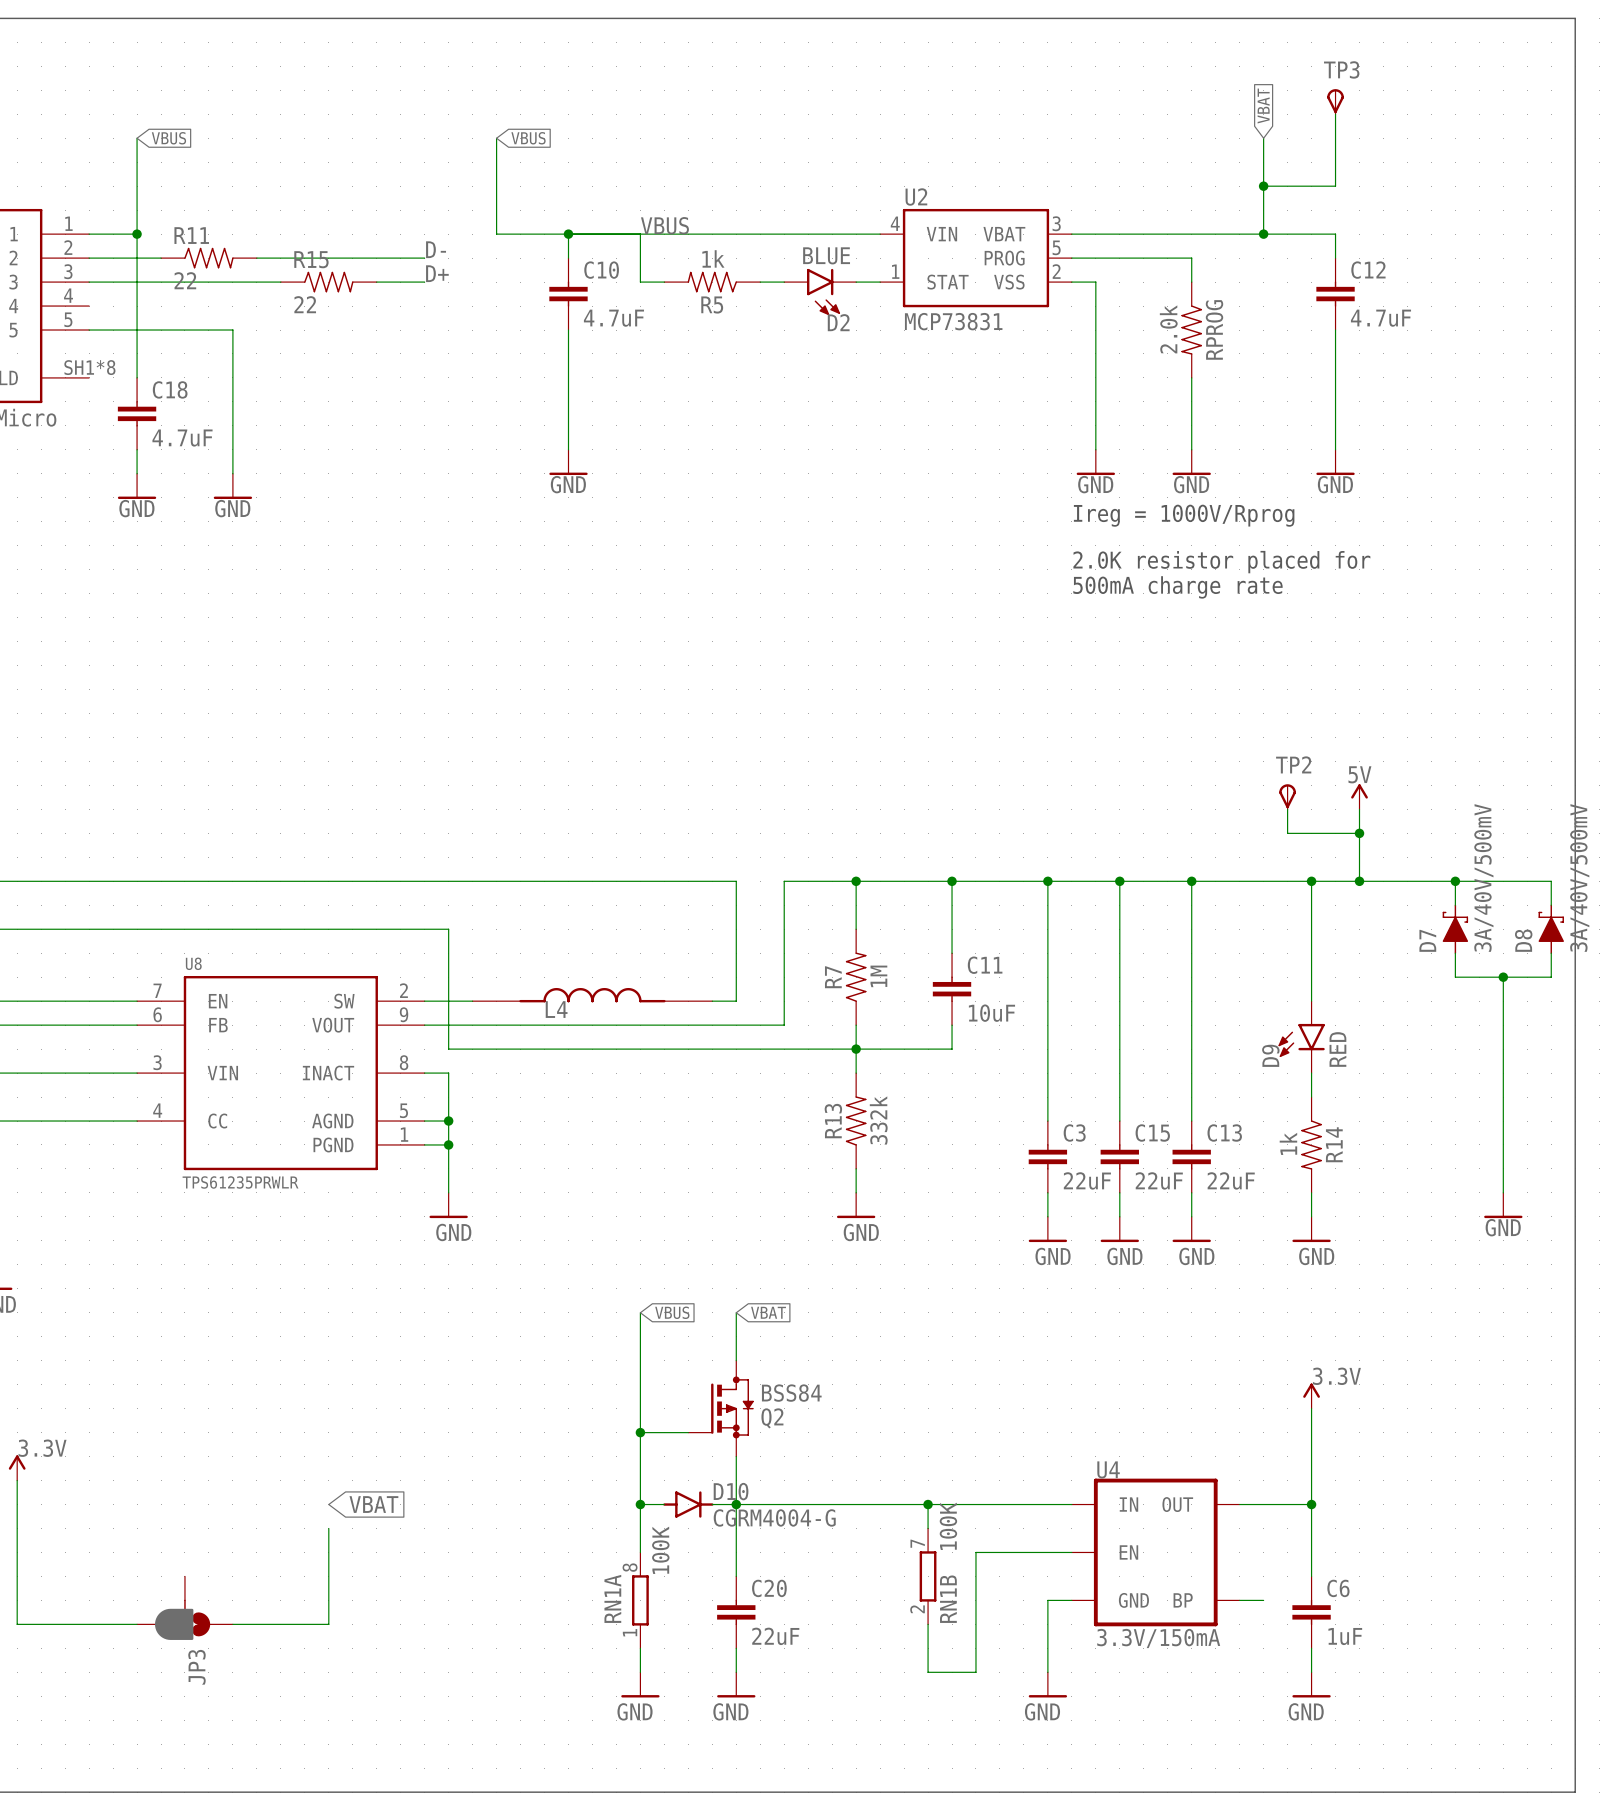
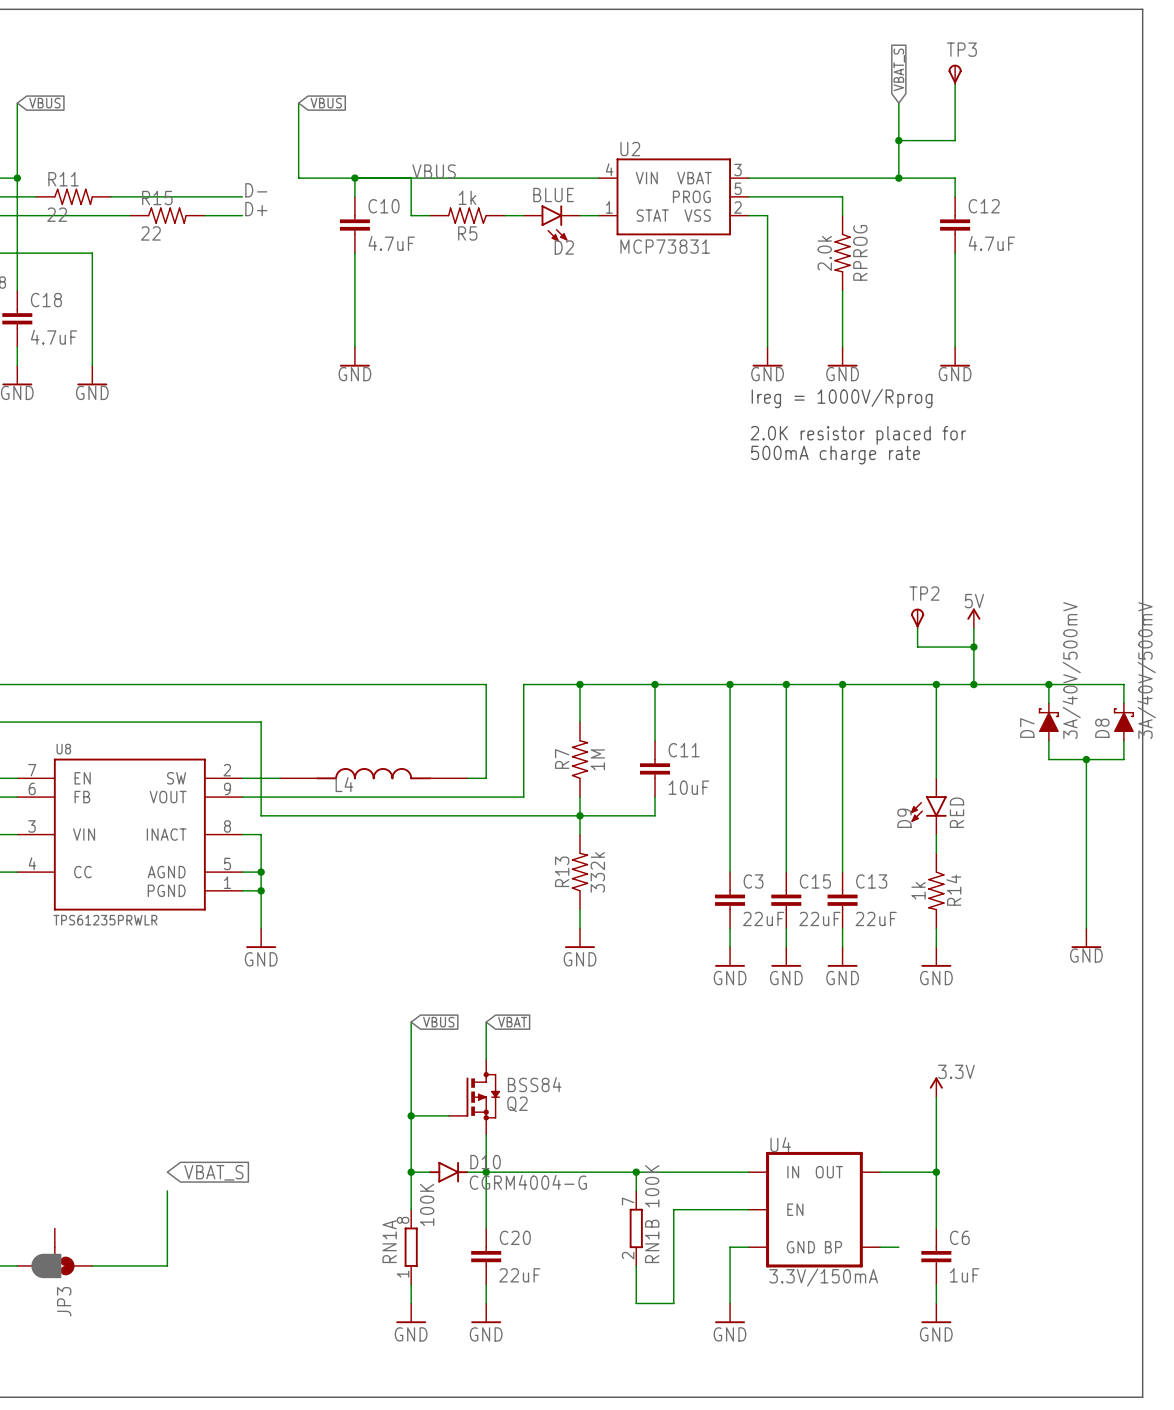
global label: VBAT (1263, 106) -> VBAT_S (899, 69)
global label: VBAT (373, 1504) -> VBAT_S (213, 1172)

